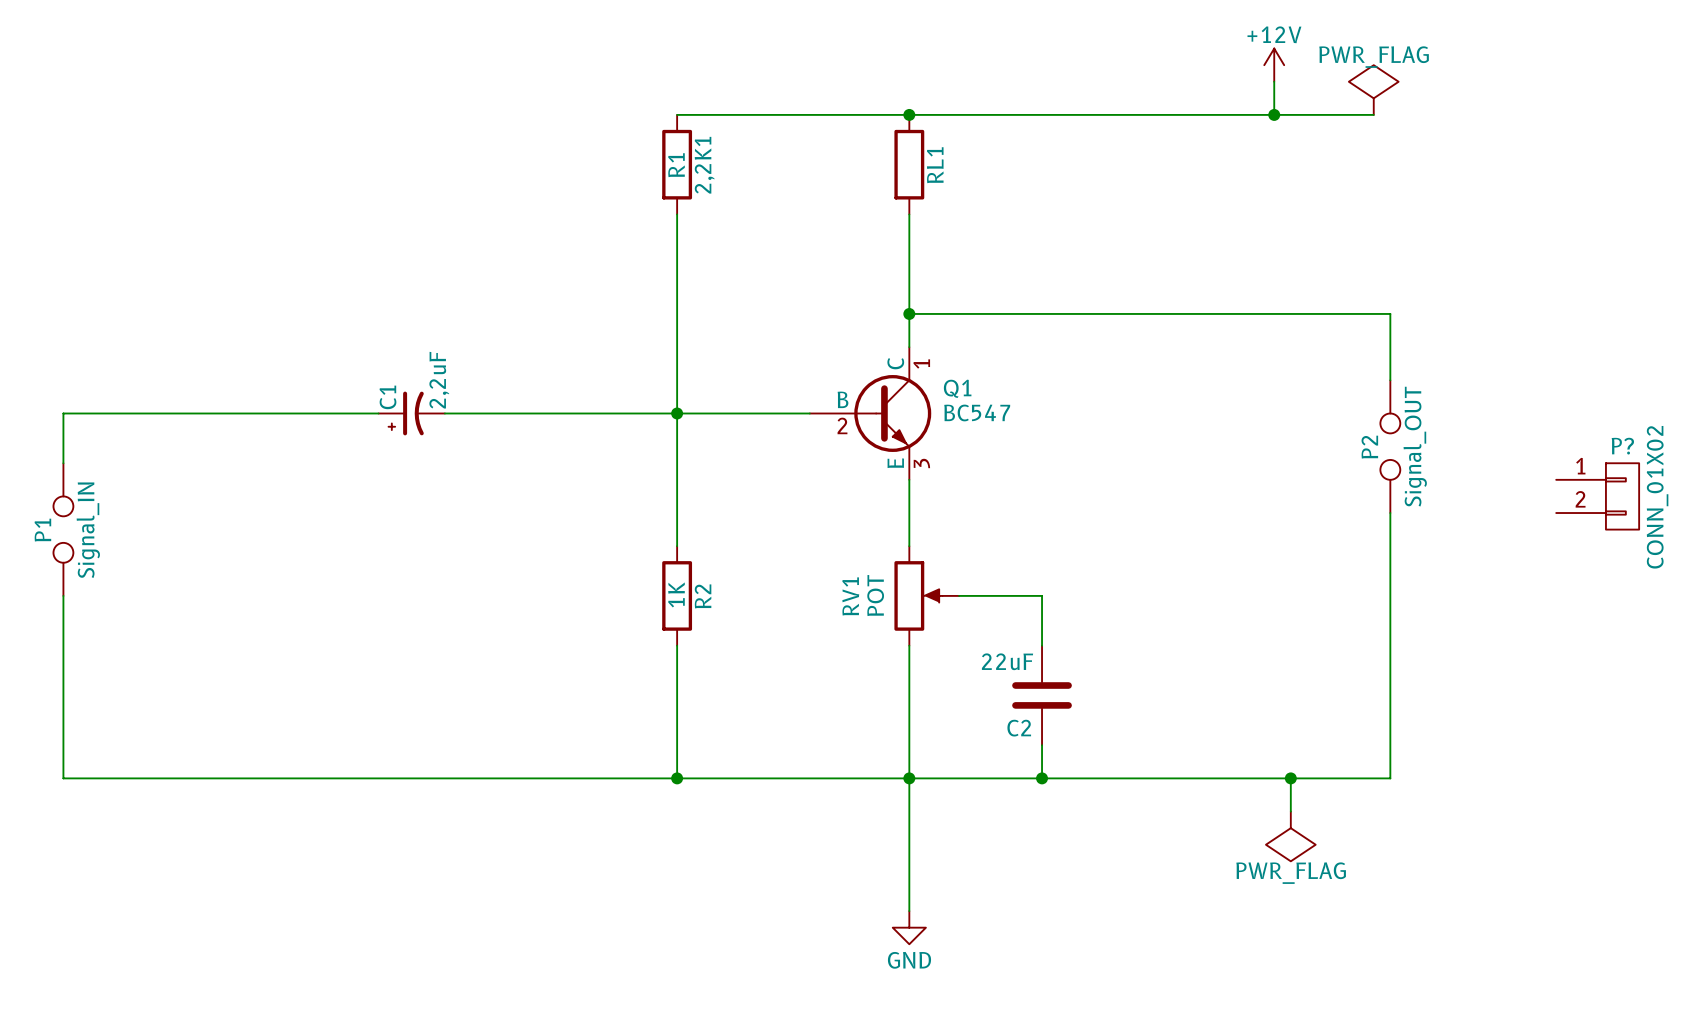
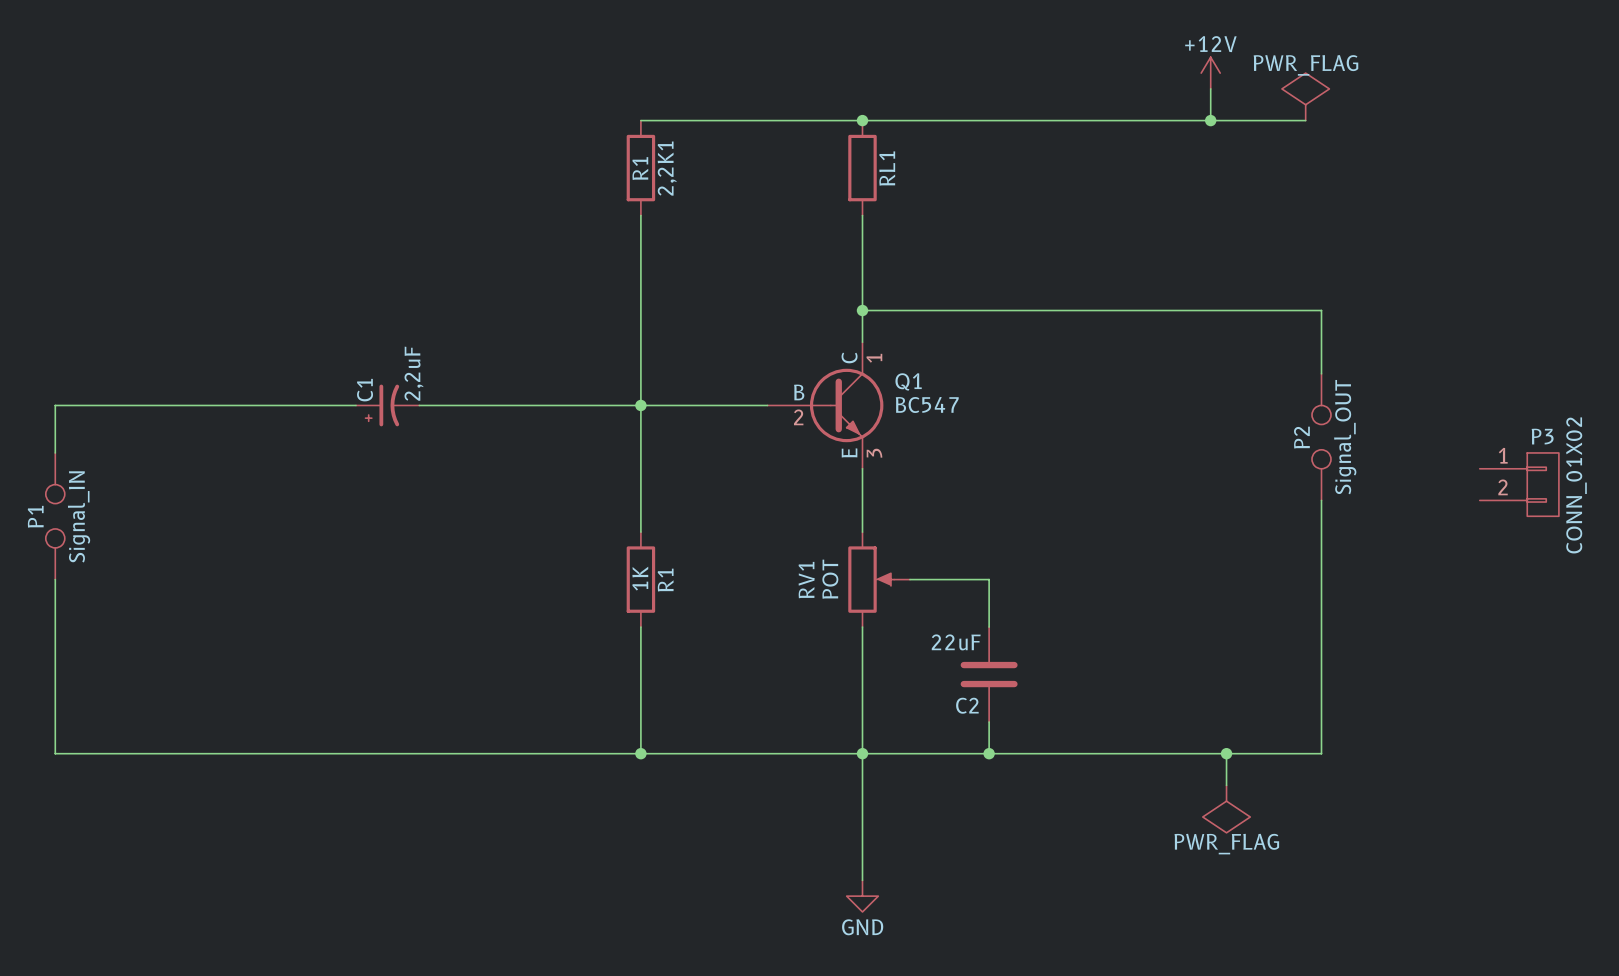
P? name: P? (1622, 446) -> P3 (1542, 436)
R2 name: R2 (703, 596) -> R1 (665, 580)

